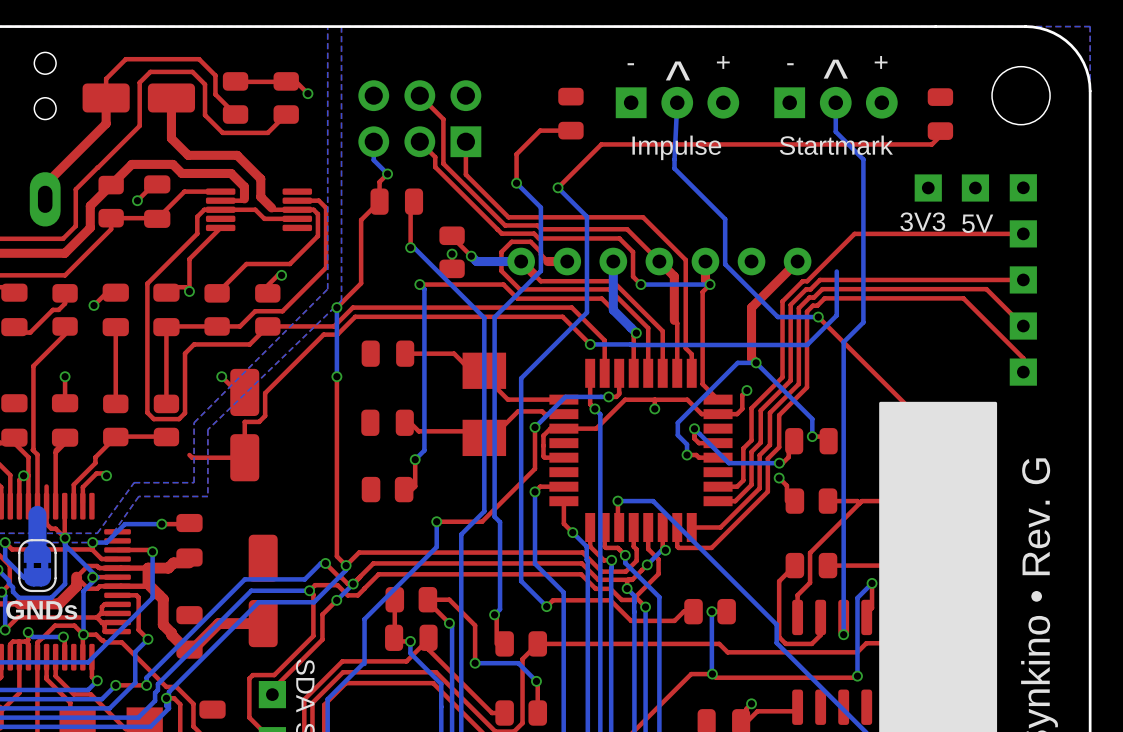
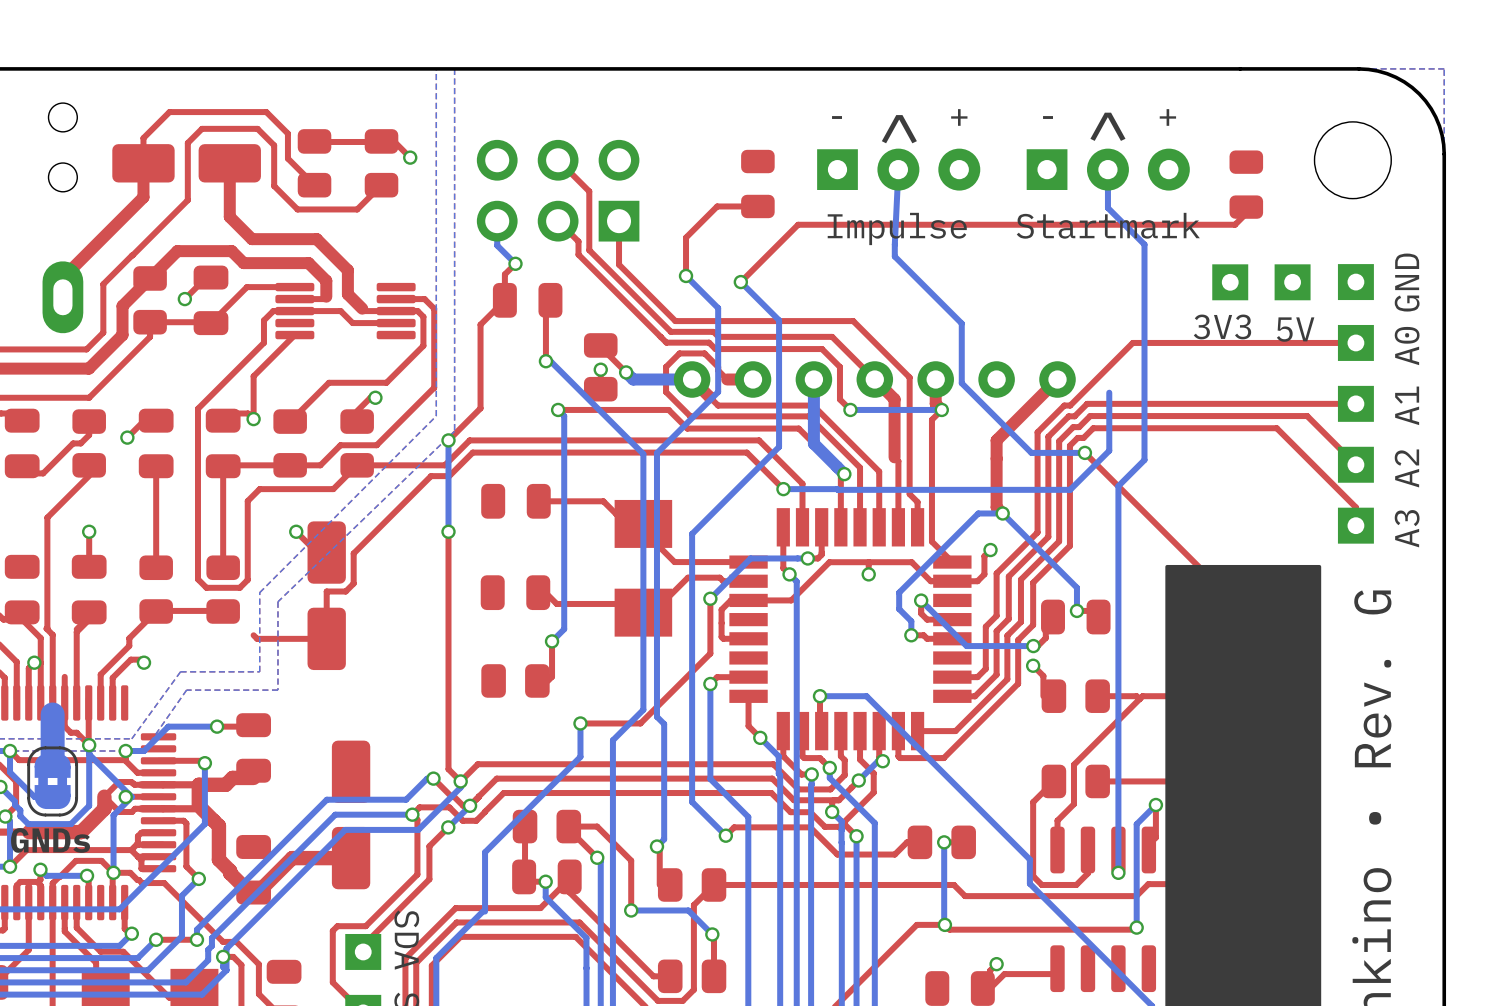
text: none -> GND (1407, 282)
text: none -> A0 (1407, 346)
text: none -> A1 (1407, 405)
text: none -> A2 (1406, 468)
text: none -> A3 (1407, 528)

